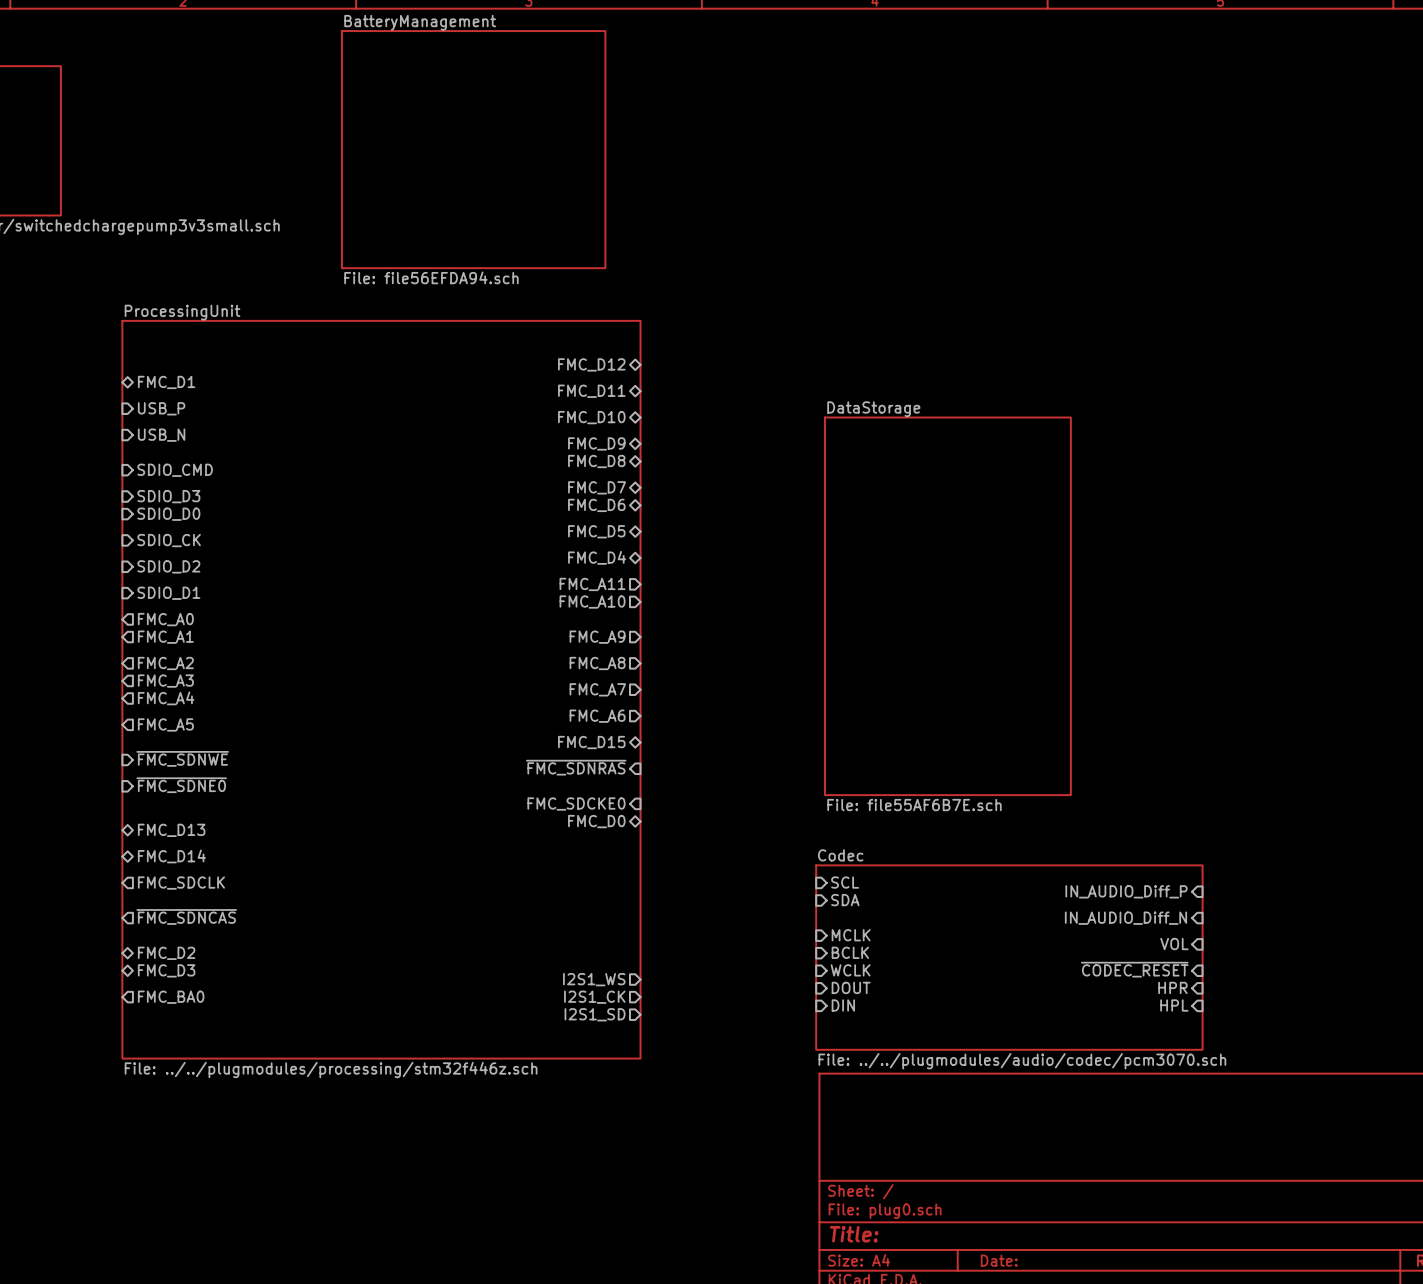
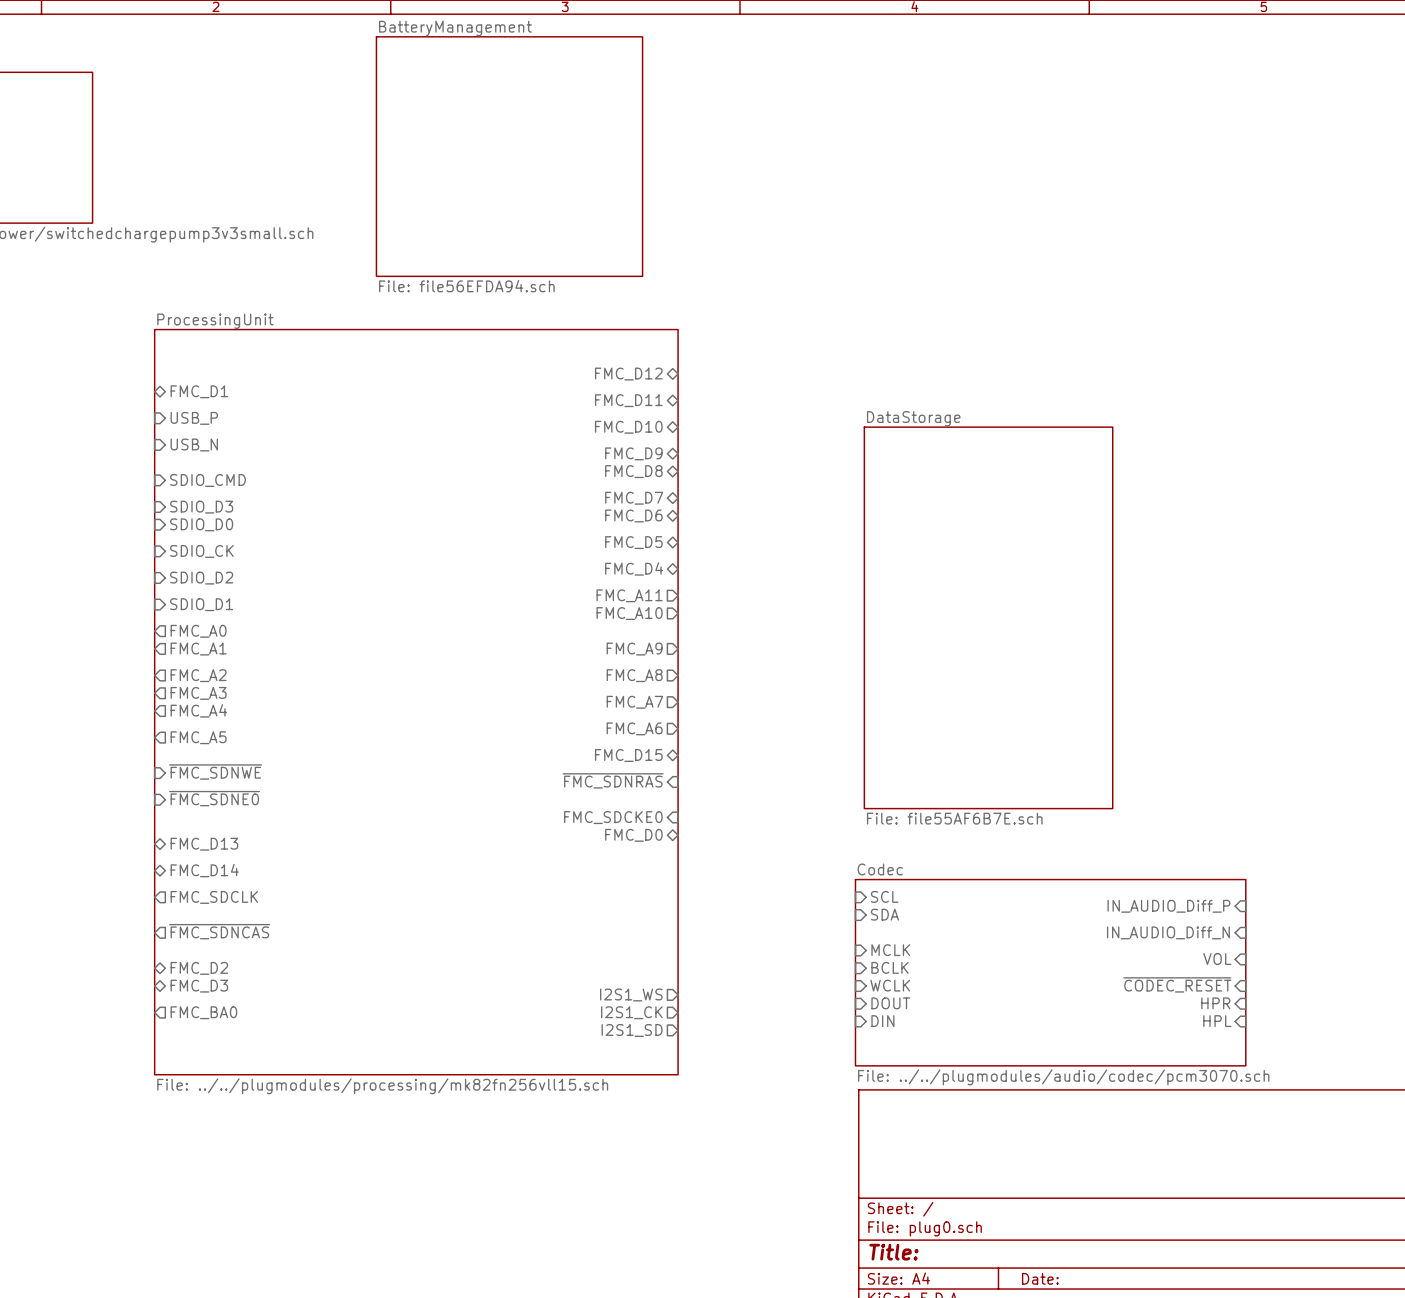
sheet ProcessingUnit value: File: ../../plugmodules/processing/stm32f446z.sch (331, 1070) -> File: ../../plugmodules/processing/mk82fn256vll15.sch (382, 1086)

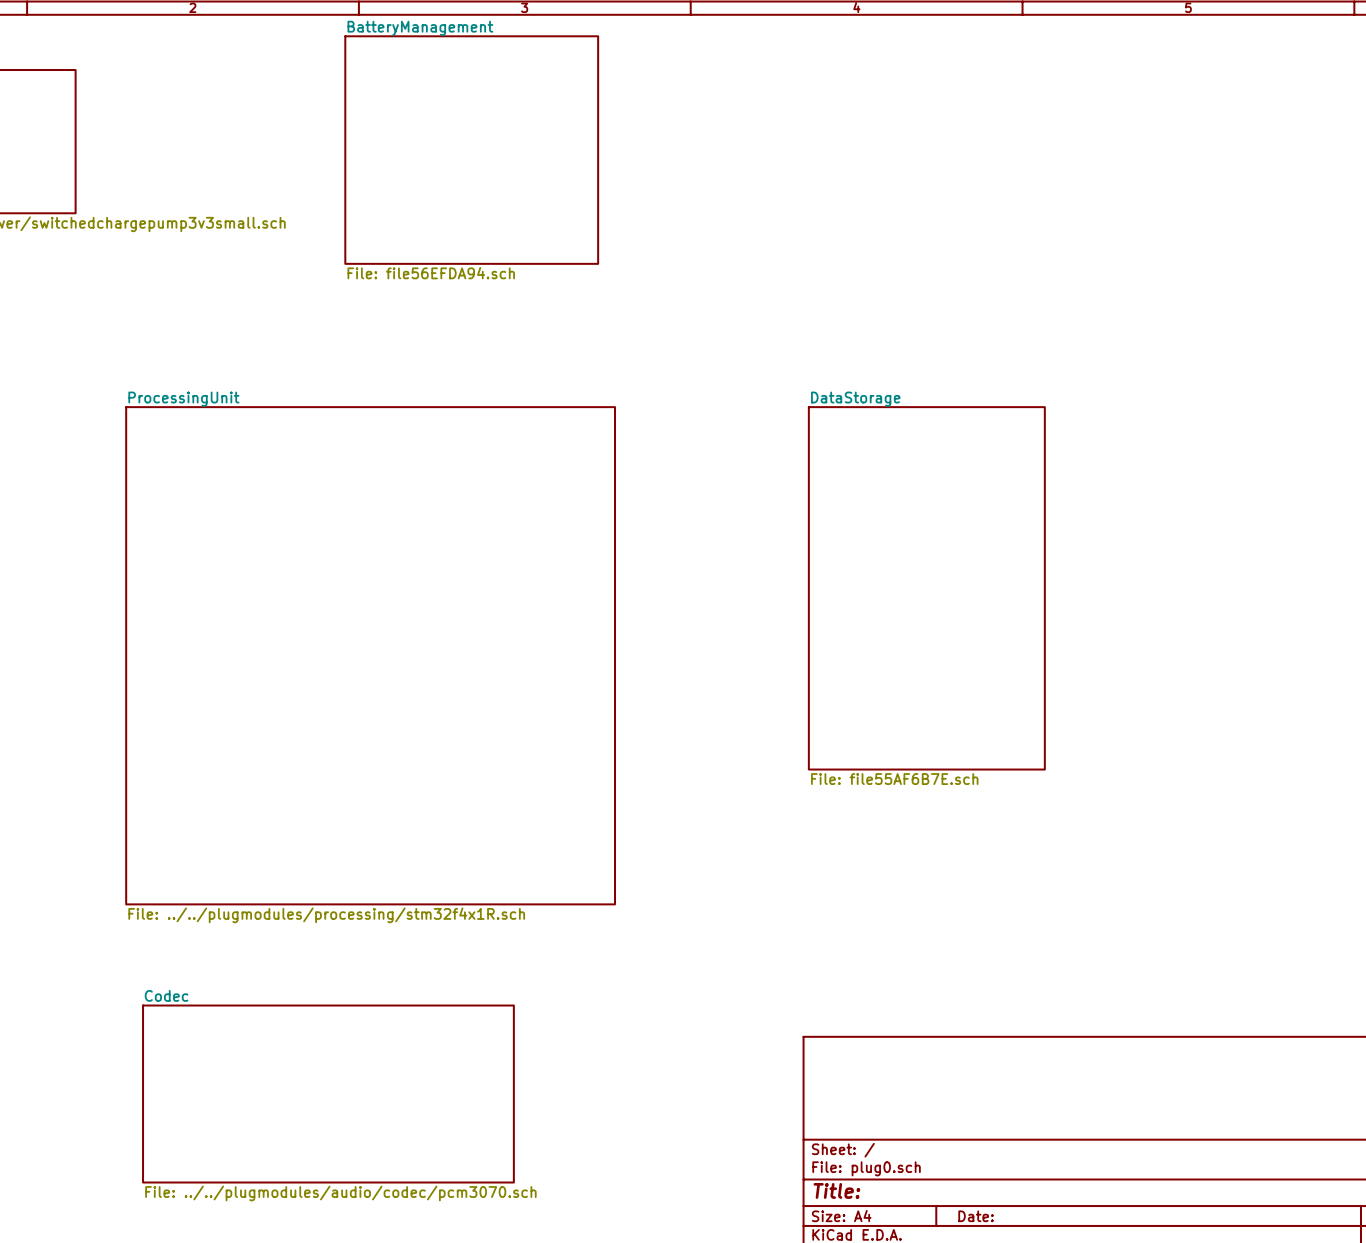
sheet pin: FMC_D12 (628, 374) -> none
sheet pin: FMC_D1 (199, 391) -> none
sheet pin: FMC_D11 (628, 400) -> none
sheet pin: USB_P (194, 418) -> none
sheet pin: FMC_D10 (628, 427) -> none
sheet pin: USB_N (194, 445) -> none
sheet pin: FMC_D9 (633, 453) -> none
sheet pin: FMC_D8 (633, 471) -> none
sheet pin: SDIO_CMD (207, 480) -> none
sheet pin: FMC_D7 (634, 498) -> none
sheet pin: SDIO_D3 (201, 507) -> none
sheet pin: FMC_D6 (633, 515) -> none
sheet pin: SDIO_D0 (201, 524) -> none
sheet pin: FMC_D5 (633, 542) -> none
sheet pin: SDIO_CK (201, 551) -> none
sheet pin: FMC_D4 (634, 568) -> none
sheet pin: SDIO_D2 (201, 578) -> none
sheet pin: FMC_A11 (629, 595) -> none
sheet pin: SDIO_D1 (201, 604) -> none
sheet pin: FMC_A10 (629, 613) -> none
sheet pin: FMC_A0 (198, 631) -> none
sheet pin: FMC_A1 (198, 649) -> none
sheet pin: FMC_A9 (634, 649) -> none
sheet pin: FMC_A2 (198, 675) -> none
sheet pin: FMC_A8 (634, 675) -> none
sheet ProcessingUnit: none -> File: ../../plugmodules/processing/stm32f4x1R.sch (370, 655)
sheet pin: FMC_A3 (198, 693) -> none
sheet ProcessingUnit: File: ../../plugmodules/processing/mk82fn256vll15.sch (416, 702) -> none
sheet pin: FMC_A7 (634, 702) -> none
sheet pin: FMC_A4 (198, 710) -> none
sheet pin: FMC_A6 (634, 728) -> none
sheet pin: FMC_A5 (198, 737) -> none
sheet pin: FMC_D15 (628, 755) -> none
sheet pin: ~{FMC_SDNWE} (215, 772) -> none
sheet pin: ~{FMC_SDNRAS} (613, 780) -> none
sheet pin: ~{FMC_SDNE0} (214, 798) -> none
sheet pin: FMC_SDCKE0 (613, 817) -> none
sheet pin: FMC_D0 (633, 835) -> none
sheet pin: FMC_D13 (204, 844) -> none
sheet pin: FMC_D14 (204, 870) -> none
sheet pin: SCL (884, 896) -> none
sheet pin: FMC_SDCLK (214, 897) -> none
sheet pin: IN_AUDIO_Diff_P (1168, 906) -> none
sheet pin: SDA (884, 914) -> none
sheet pin: ~{FMC_SDNCAS} (219, 931) -> none
sheet pin: IN_AUDIO_Diff_N (1168, 932) -> none
sheet pin: MCLK (890, 950) -> none
sheet pin: VOL (1217, 959) -> none
sheet pin: BCLK (890, 967) -> none
sheet pin: FMC_D2 (199, 968) -> none
sheet Codec: File: ../../plugmodules/audio/codec/pcm3070.sch (1050, 972) -> none
sheet pin: ~{CODEC_RESET} (1177, 984) -> none
sheet pin: WCLK (890, 985) -> none
sheet pin: FMC_D3 (199, 986) -> none
sheet pin: I2S1_WS (631, 995) -> none
sheet pin: DOUT (890, 1003) -> none
sheet pin: HPR (1215, 1003) -> none
sheet pin: FMC_BA0 (203, 1012) -> none
sheet pin: I2S1_CK (631, 1012) -> none
sheet pin: DIN (882, 1021) -> none
sheet pin: HPL (1217, 1021) -> none
sheet pin: I2S1_SD (632, 1030) -> none
sheet Codec: none -> File: ../../plugmodules/audio/codec/pcm3070.sch (328, 1094)

